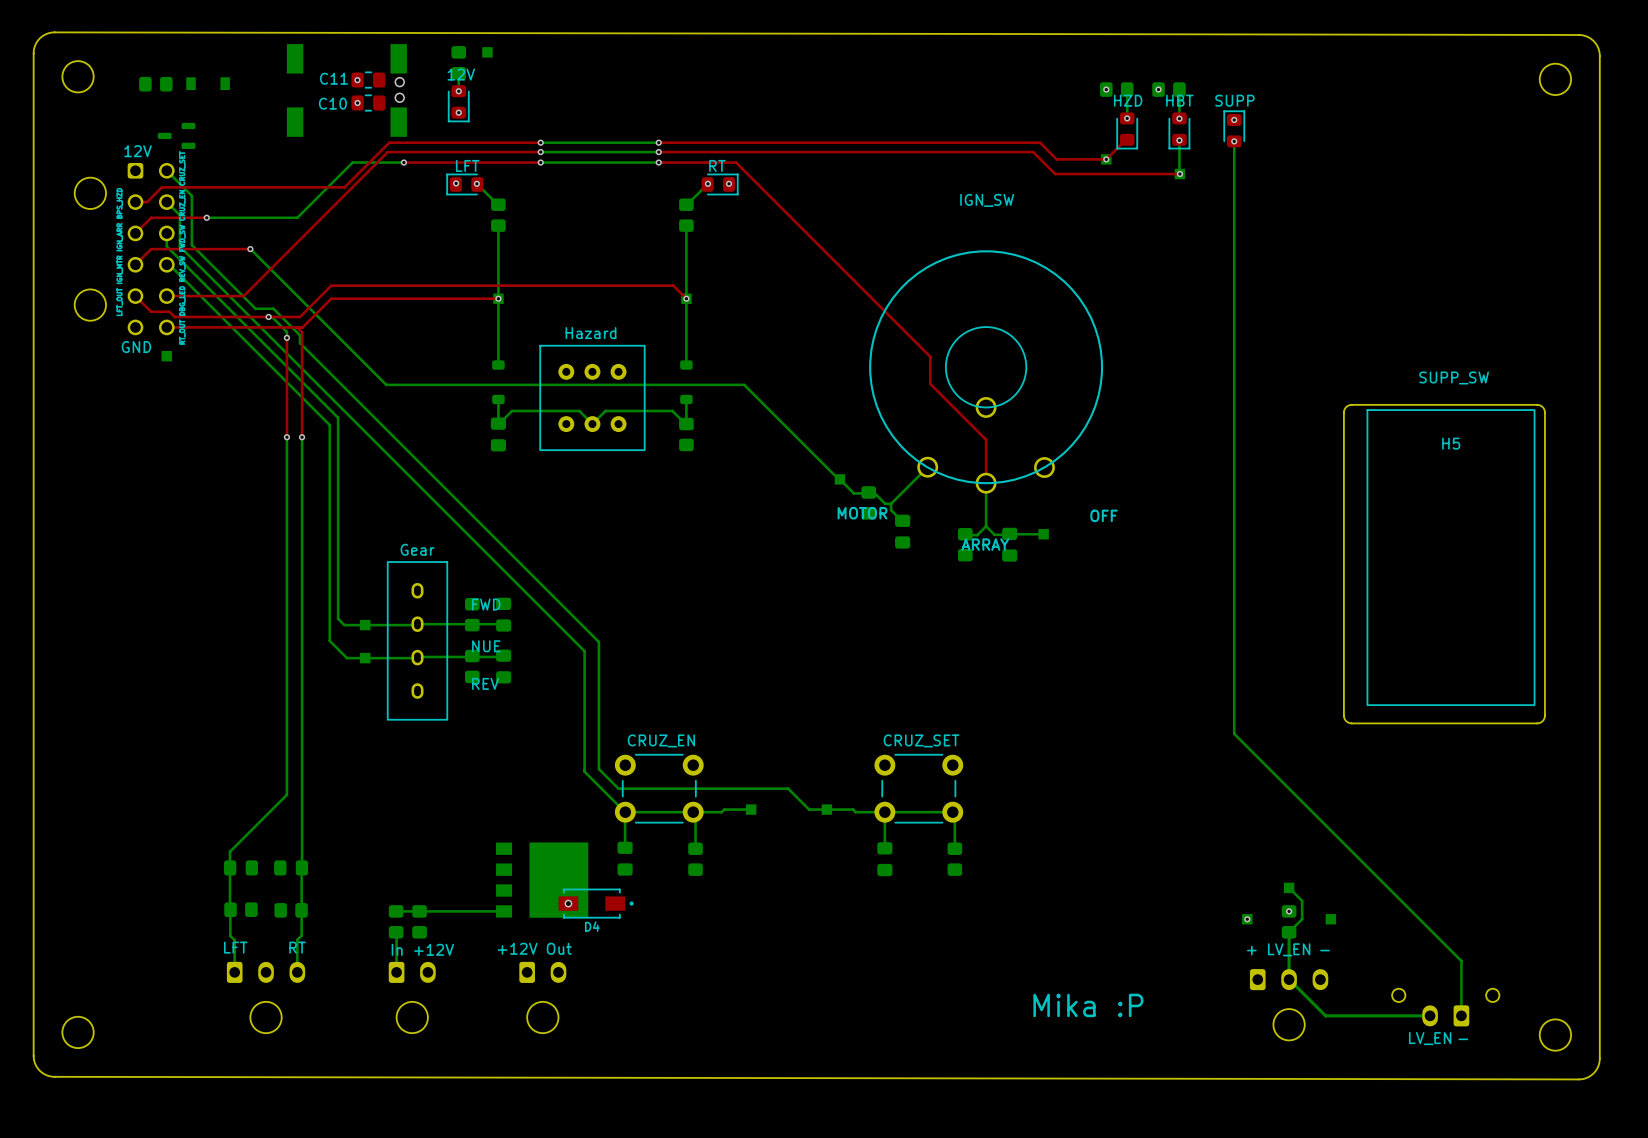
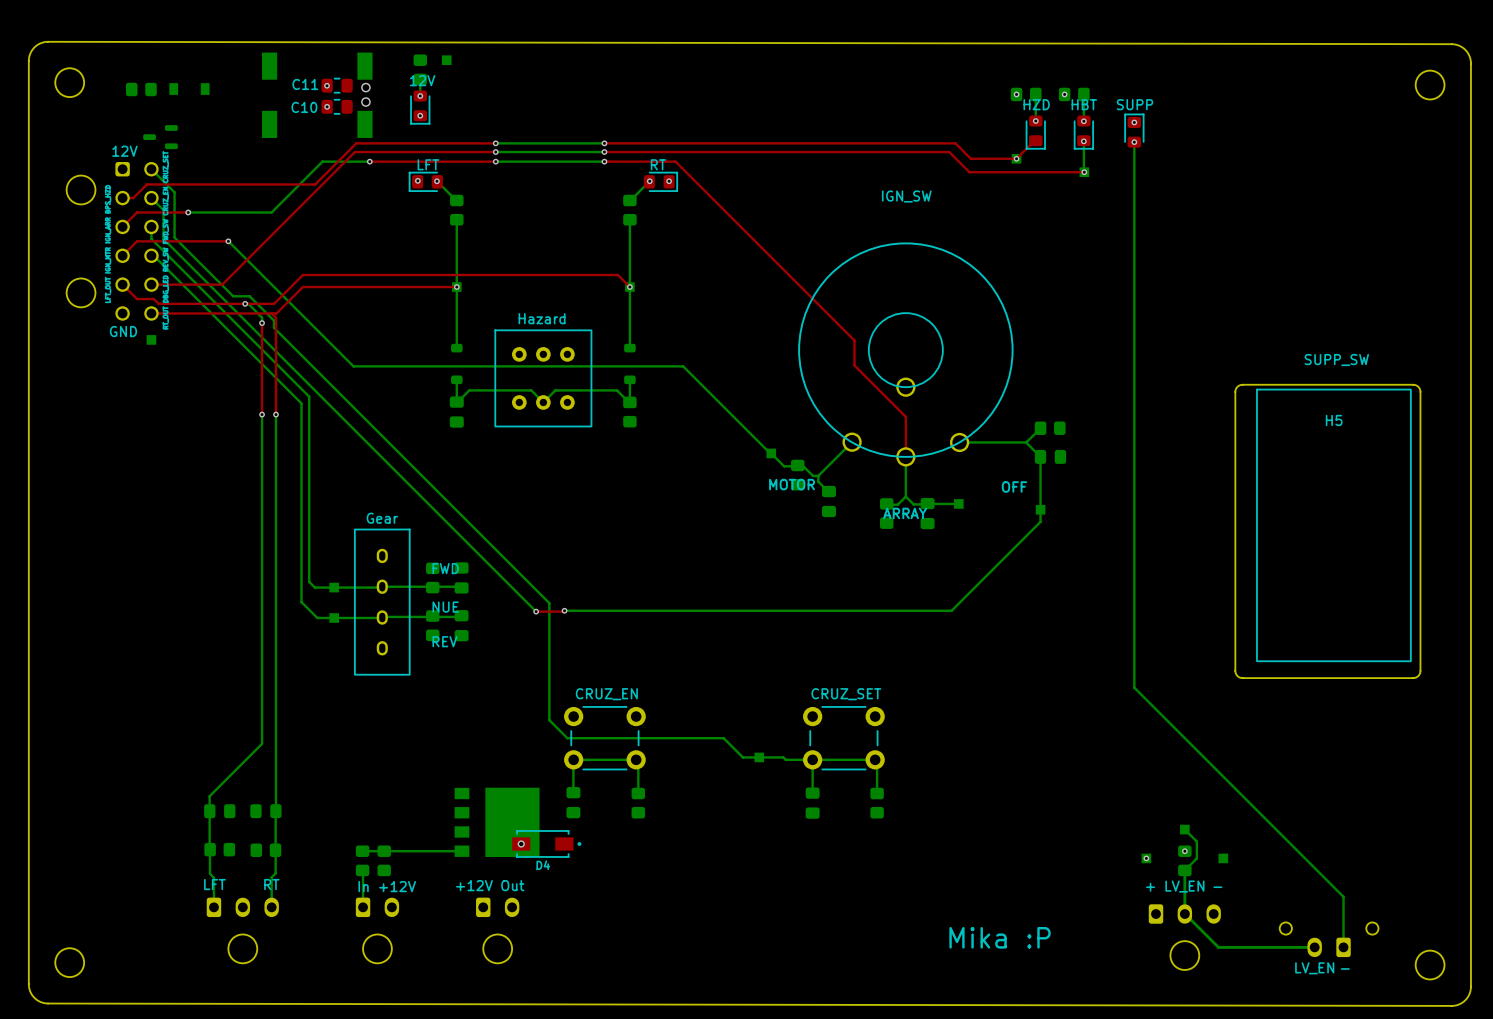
bottom track: none -> (1040, 428) (1026, 442)
part: none -> (1050, 428)
bottom track: none -> (959, 442) (1026, 442)
bottom track: none -> (1026, 442) (1040, 456) (1040, 521) (951, 610) (564, 610)
part: none -> (1050, 456)
part: none -> (1040, 509)
top track: none -> (564, 610) (536, 611)
via: none -> (564, 610)
bottom track: (584, 651) (584, 771) (625, 812) -> none
via: none -> (536, 611)
bottom track: (750, 809) (692, 812) -> none
part: (751, 809) -> none

